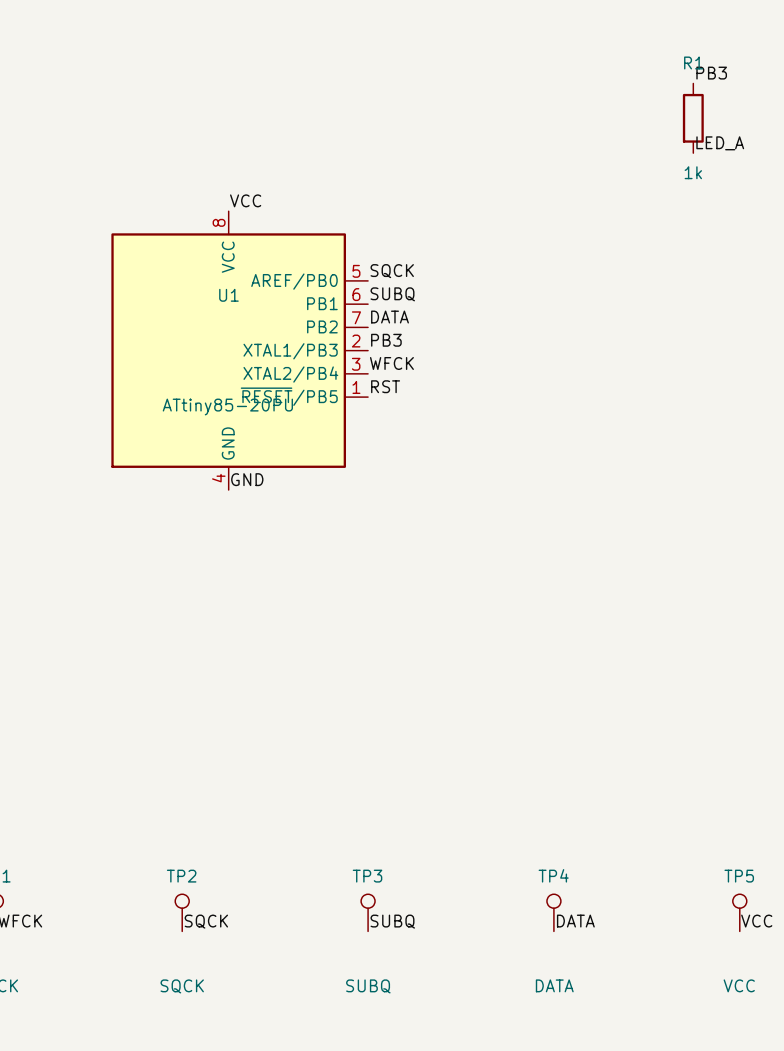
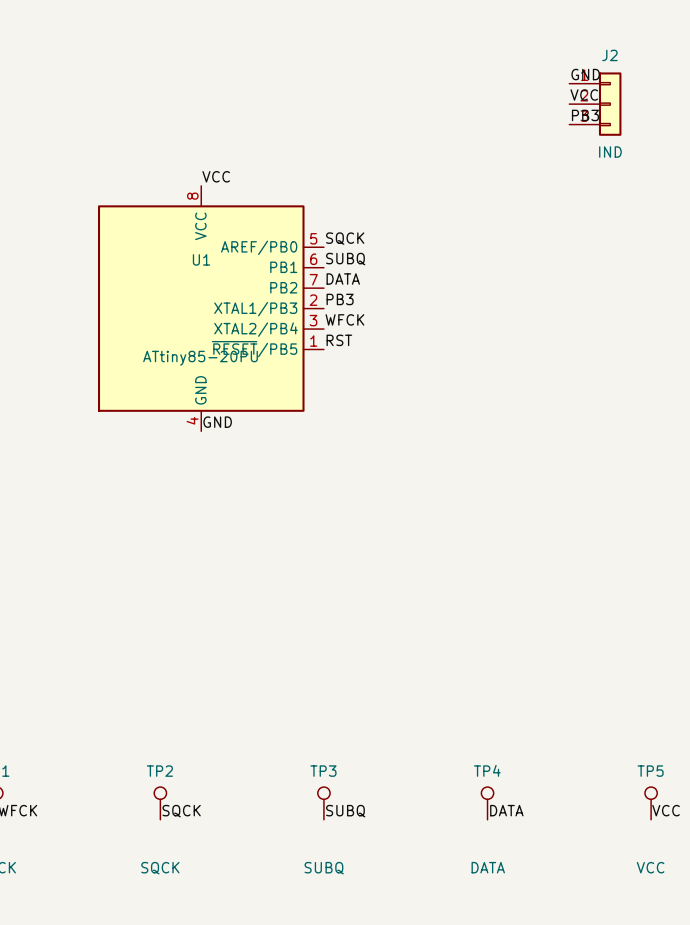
label position: PB3 (711, 73) -> PB3 (585, 115)
label: none -> GND (585, 74)
label: none -> VCC (584, 94)
J2: none -> IND (595, 104)
R1: 1k (693, 118) -> none
label: LED_A (720, 143) -> none

